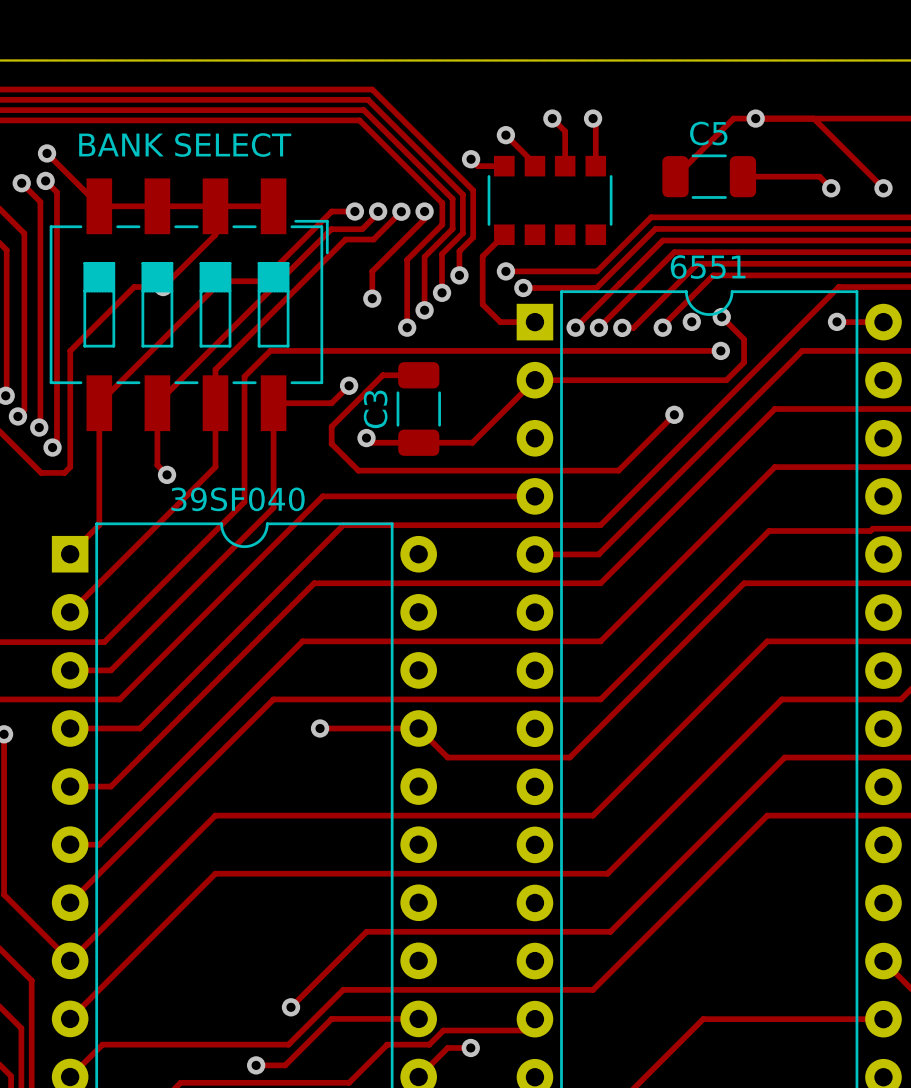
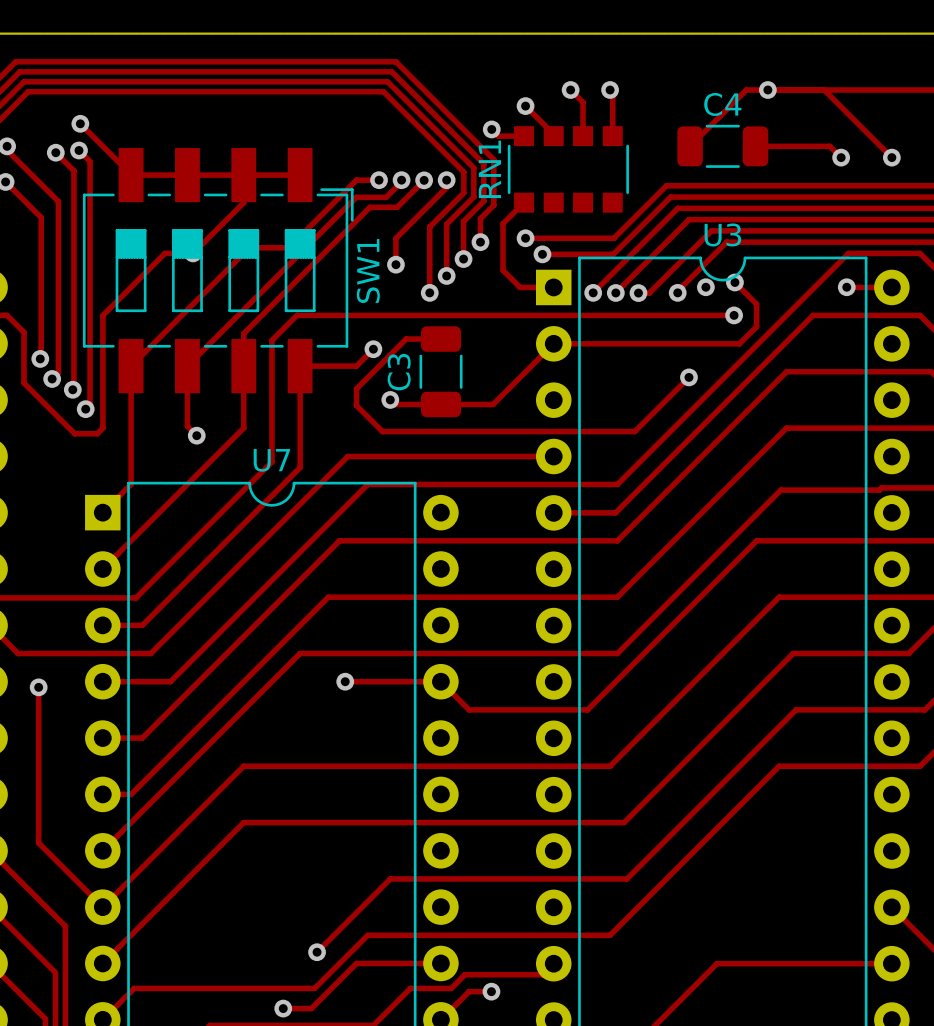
C5 name: C5 (708, 133) -> C4 (722, 104)
text: BANK SELECT (185, 145) -> none
RN1 name: none -> RN1 (489, 169)
text: 6551 (708, 267) -> none
U3 name: none -> U3 (722, 234)
SW1 name: none -> SW1 (368, 271)
text: 39SF040 (238, 499) -> none
U7 name: none -> U7 (271, 460)

